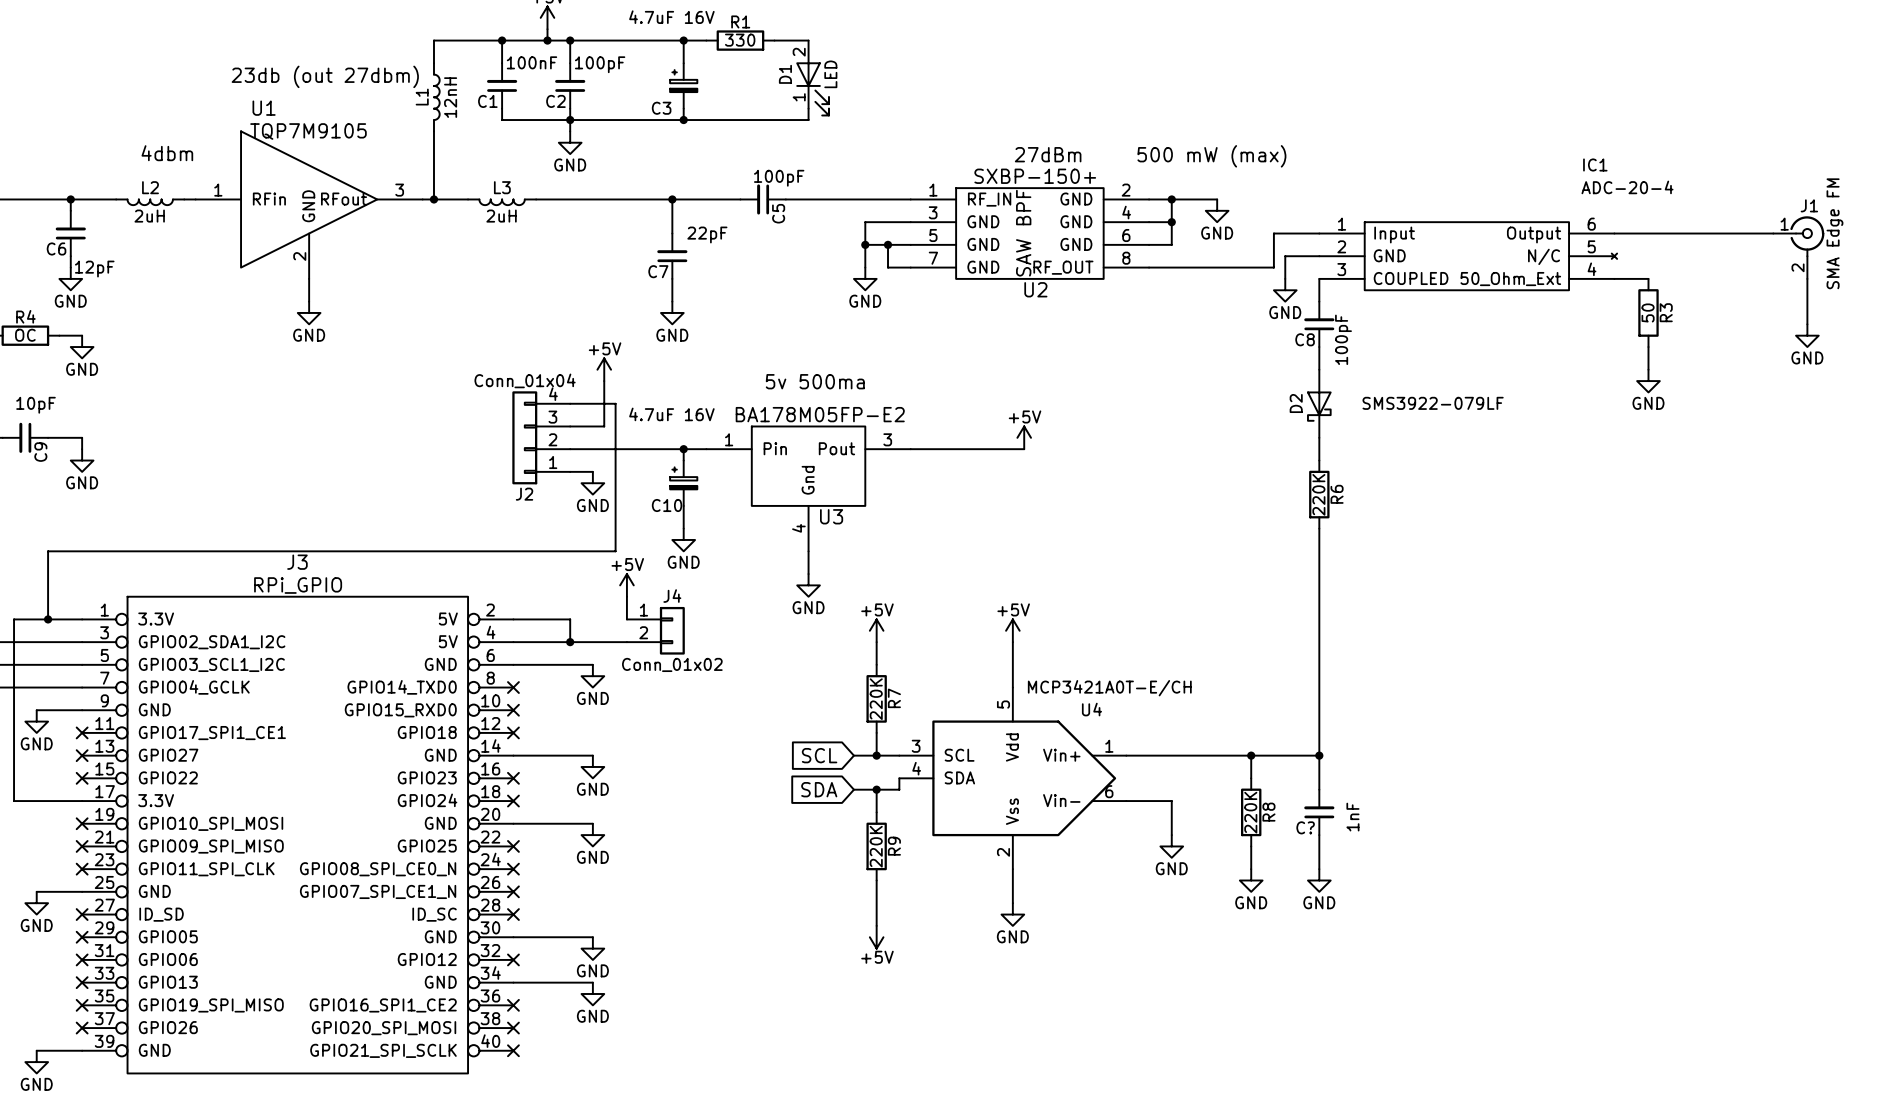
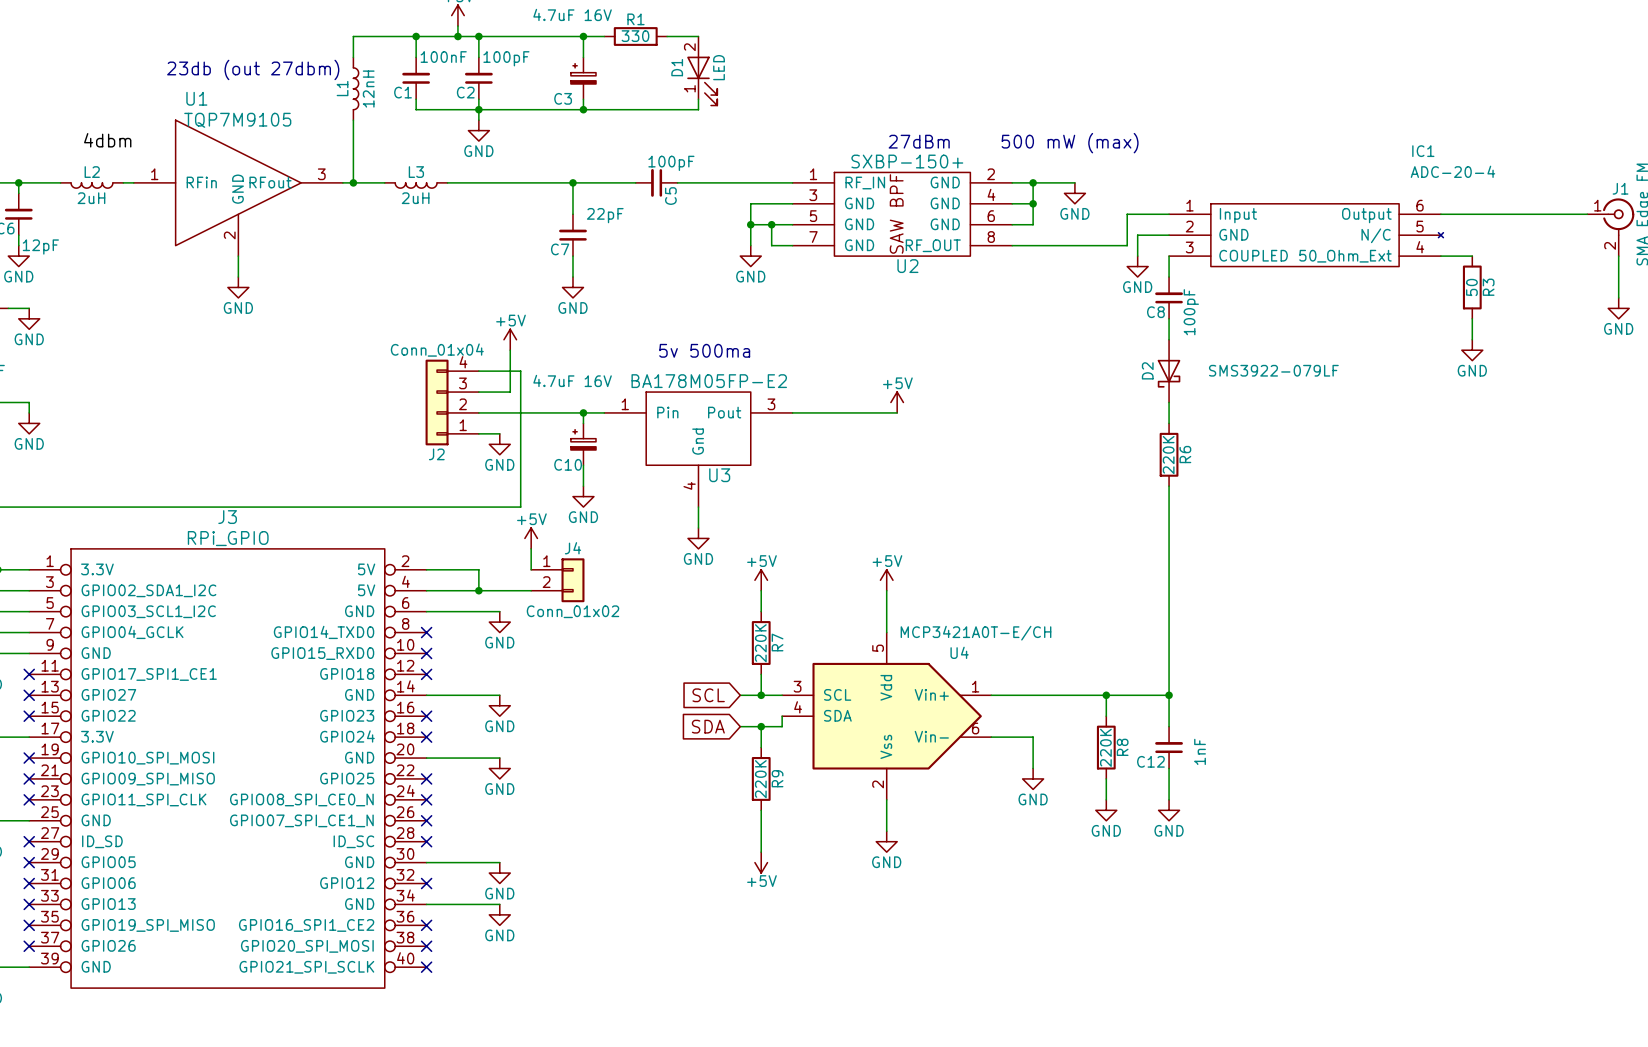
C? name: C? (1305, 827) -> C12 (1150, 761)

